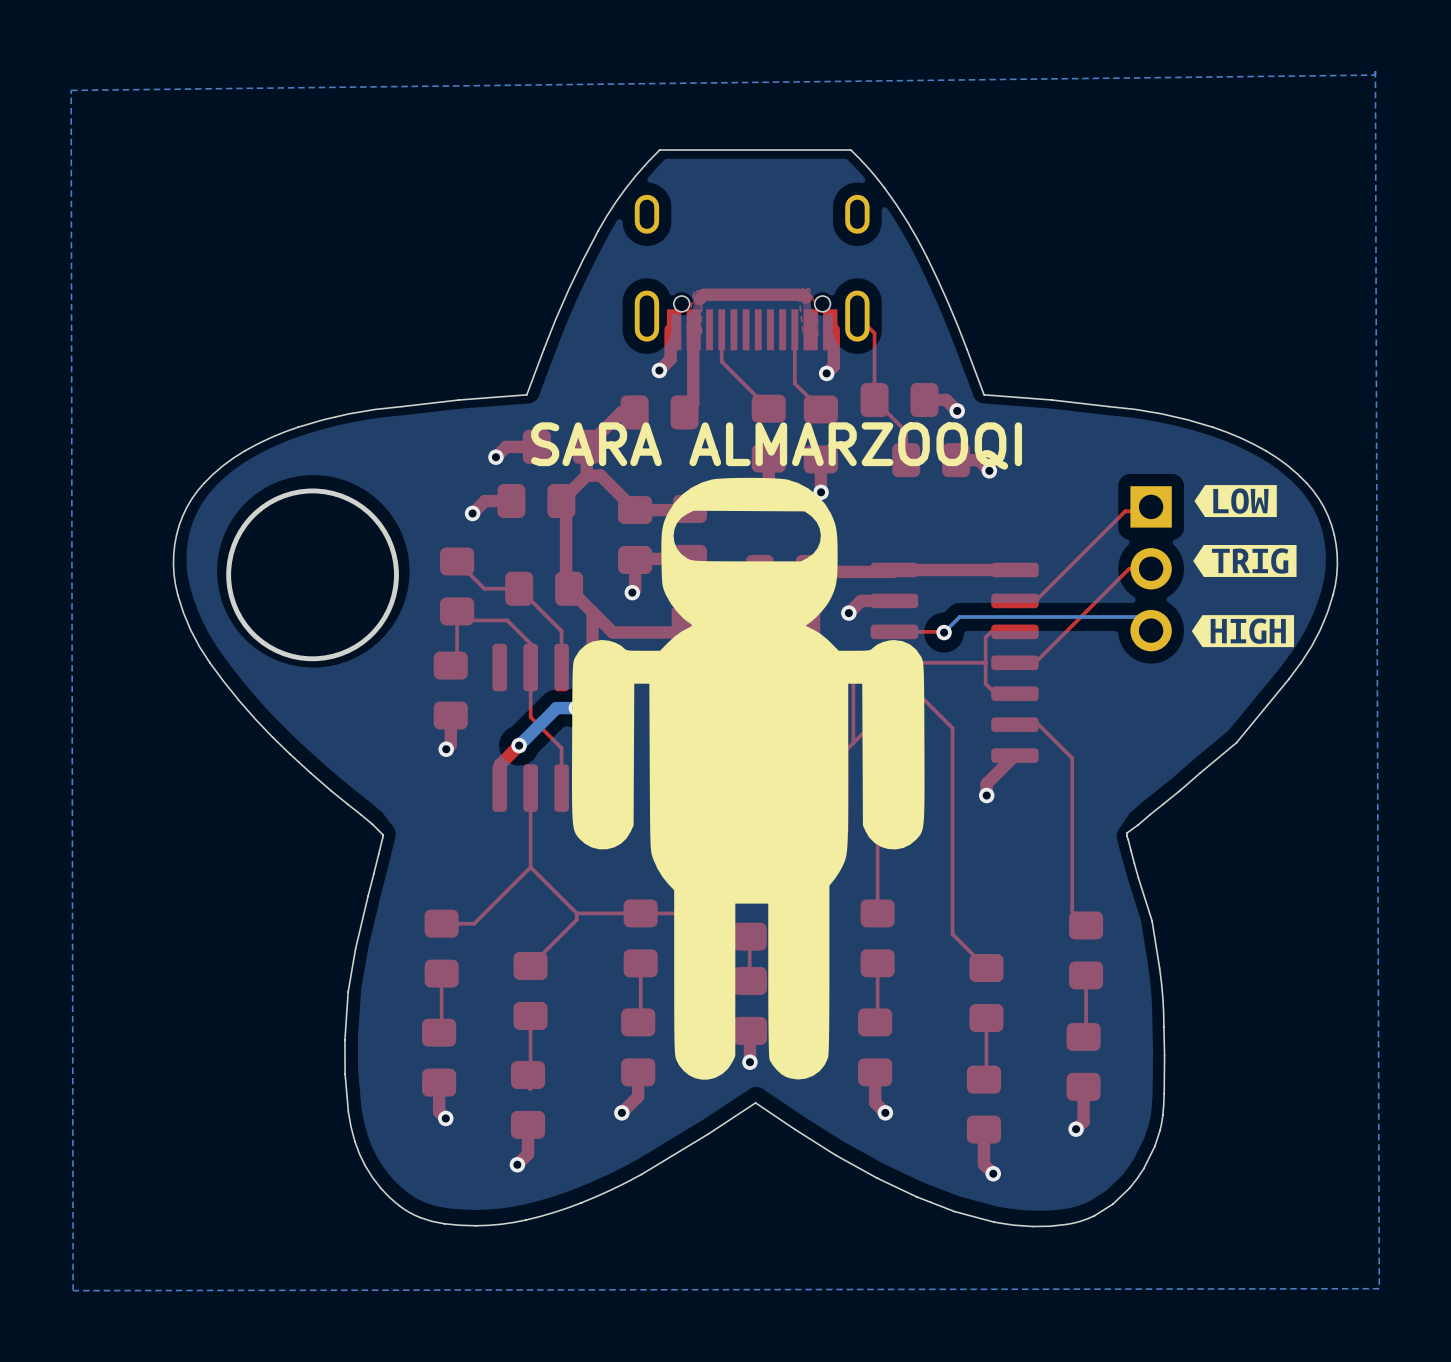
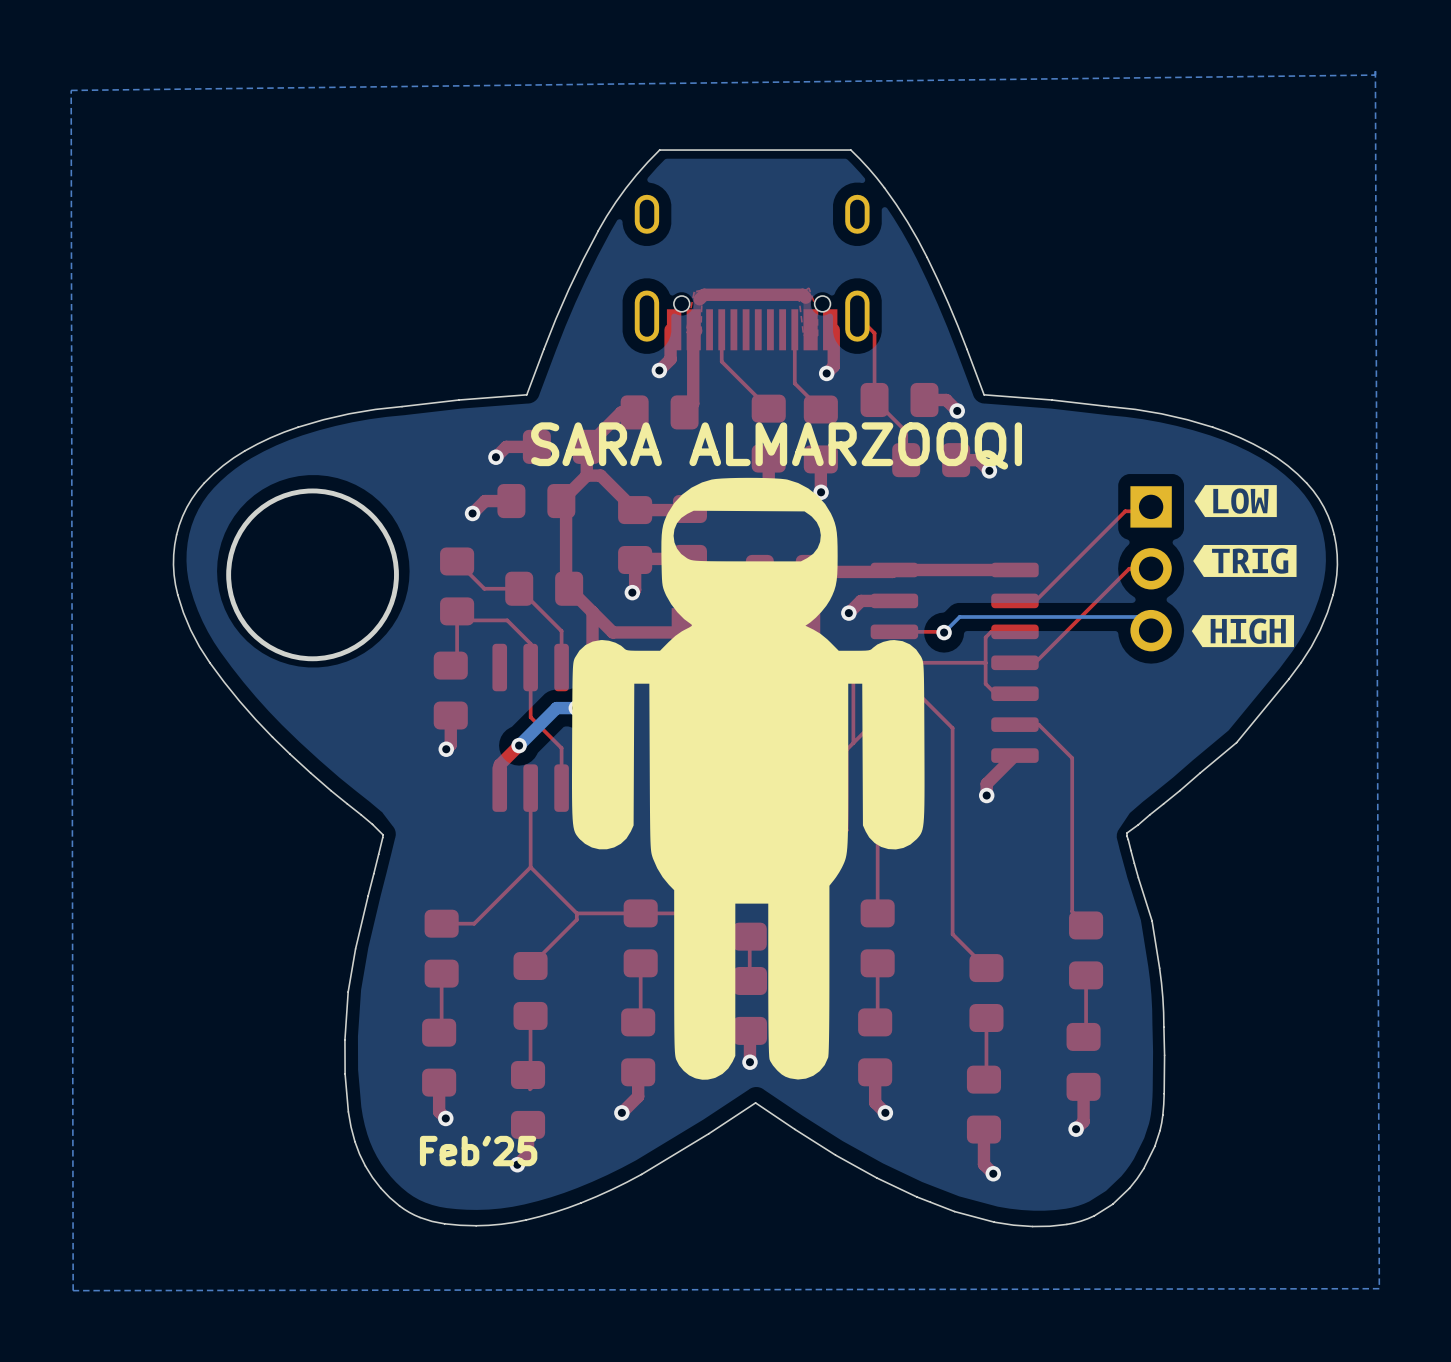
text: none -> Feb'25 (478, 1151)

